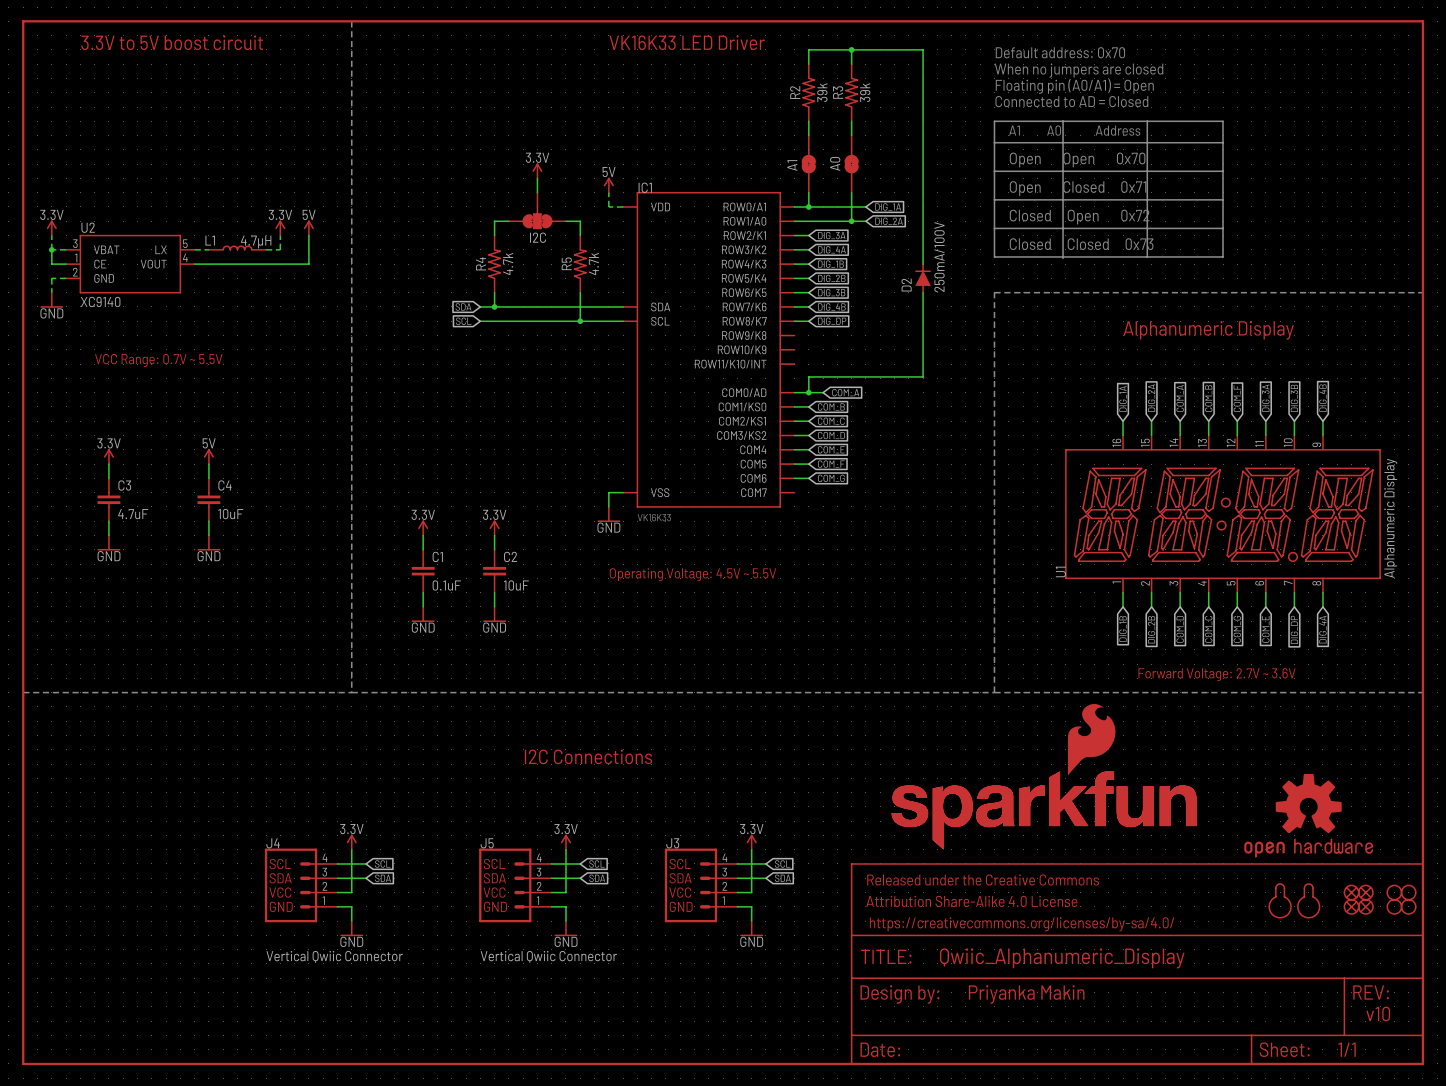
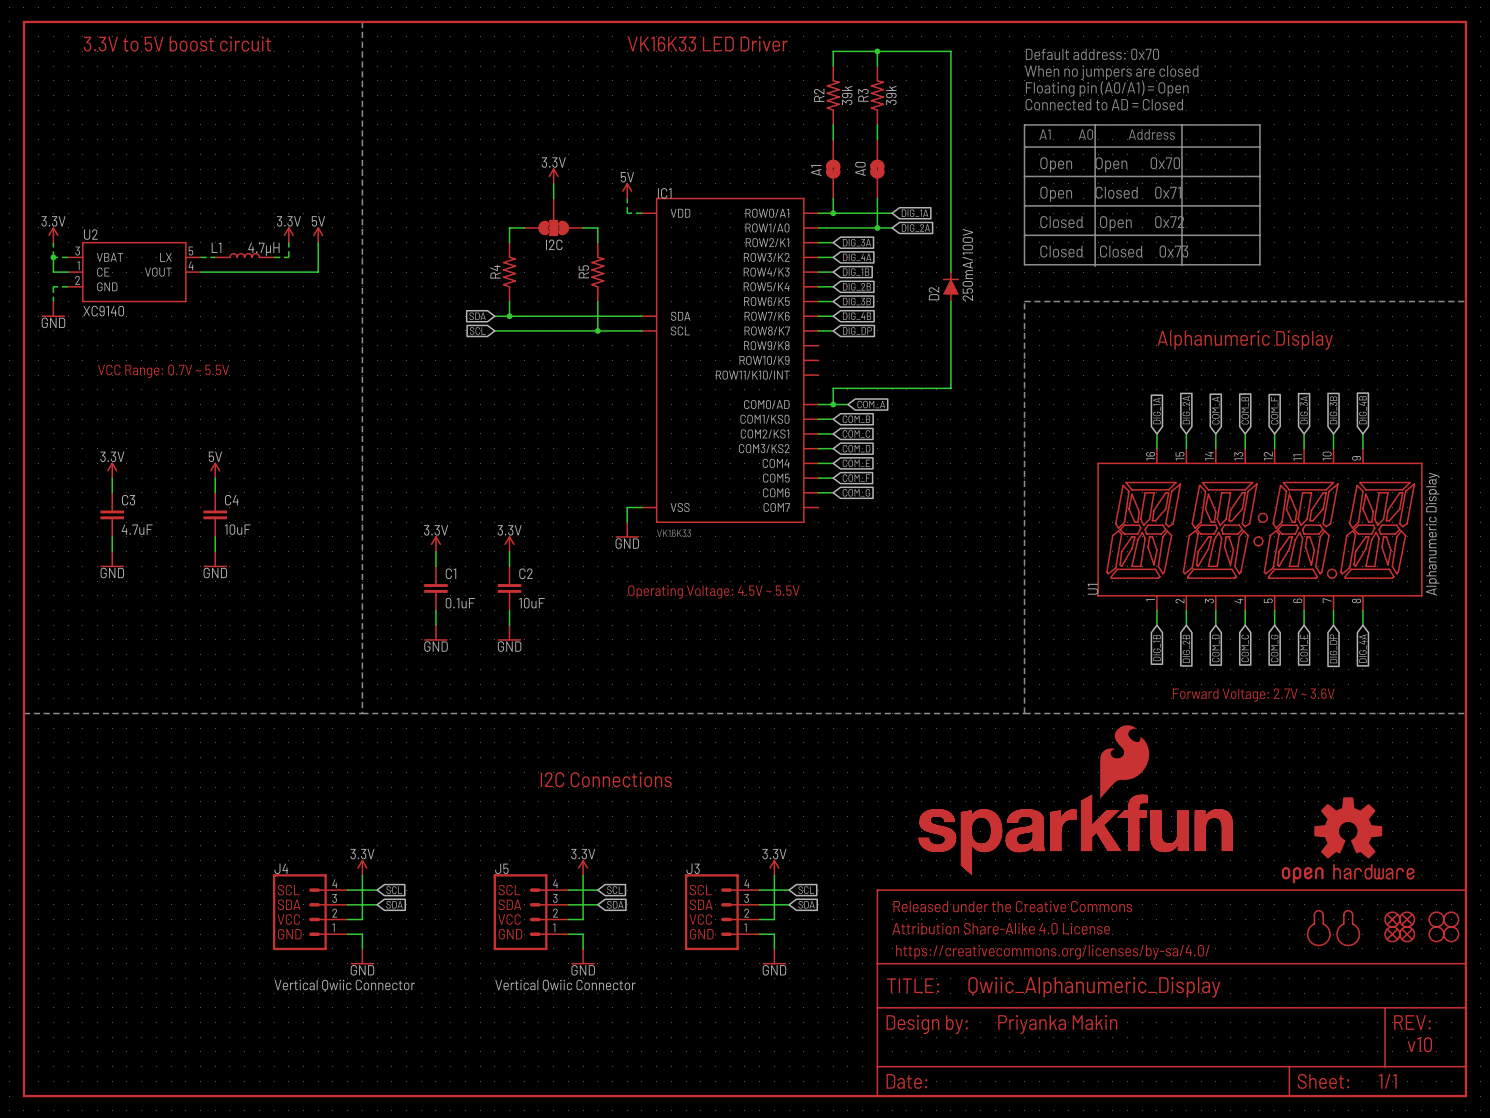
R4 value: 4.7k (508, 264) -> none
R5 value: 4.7k (593, 264) -> none

